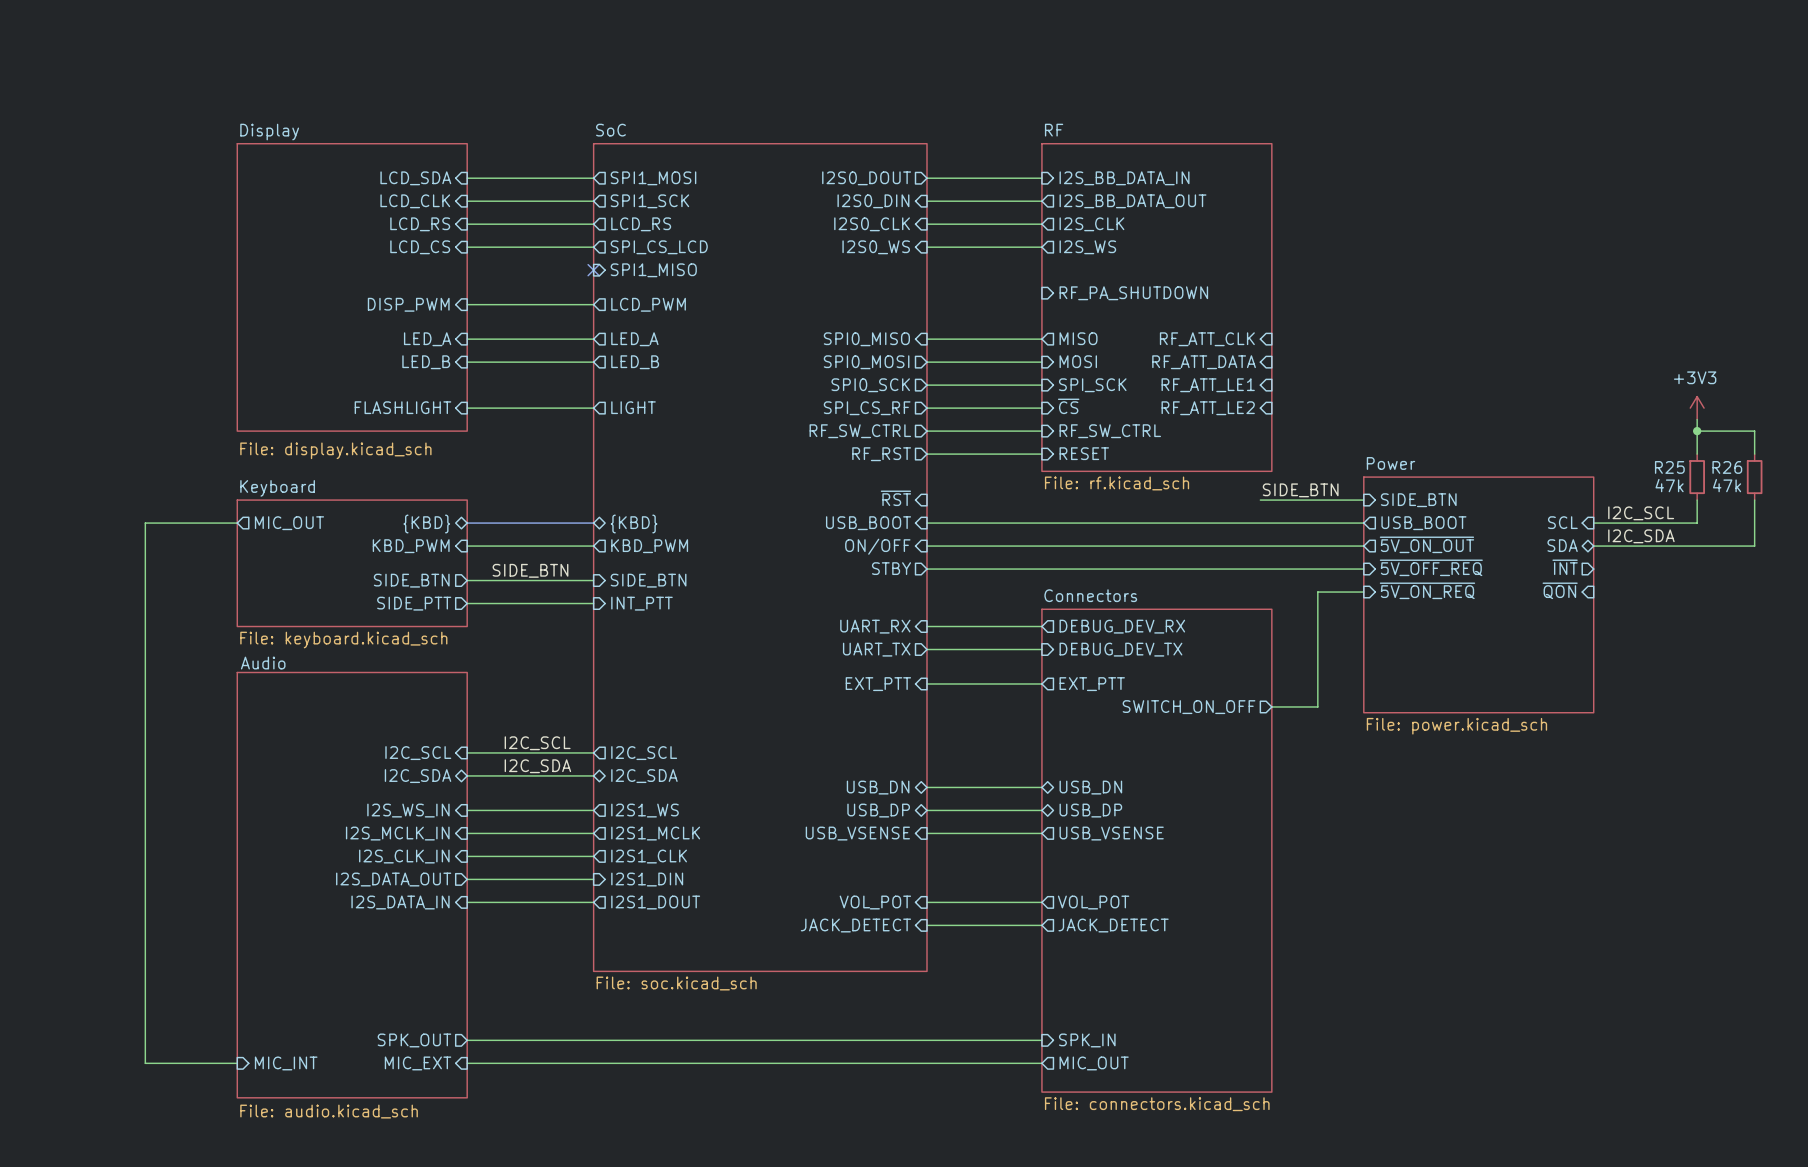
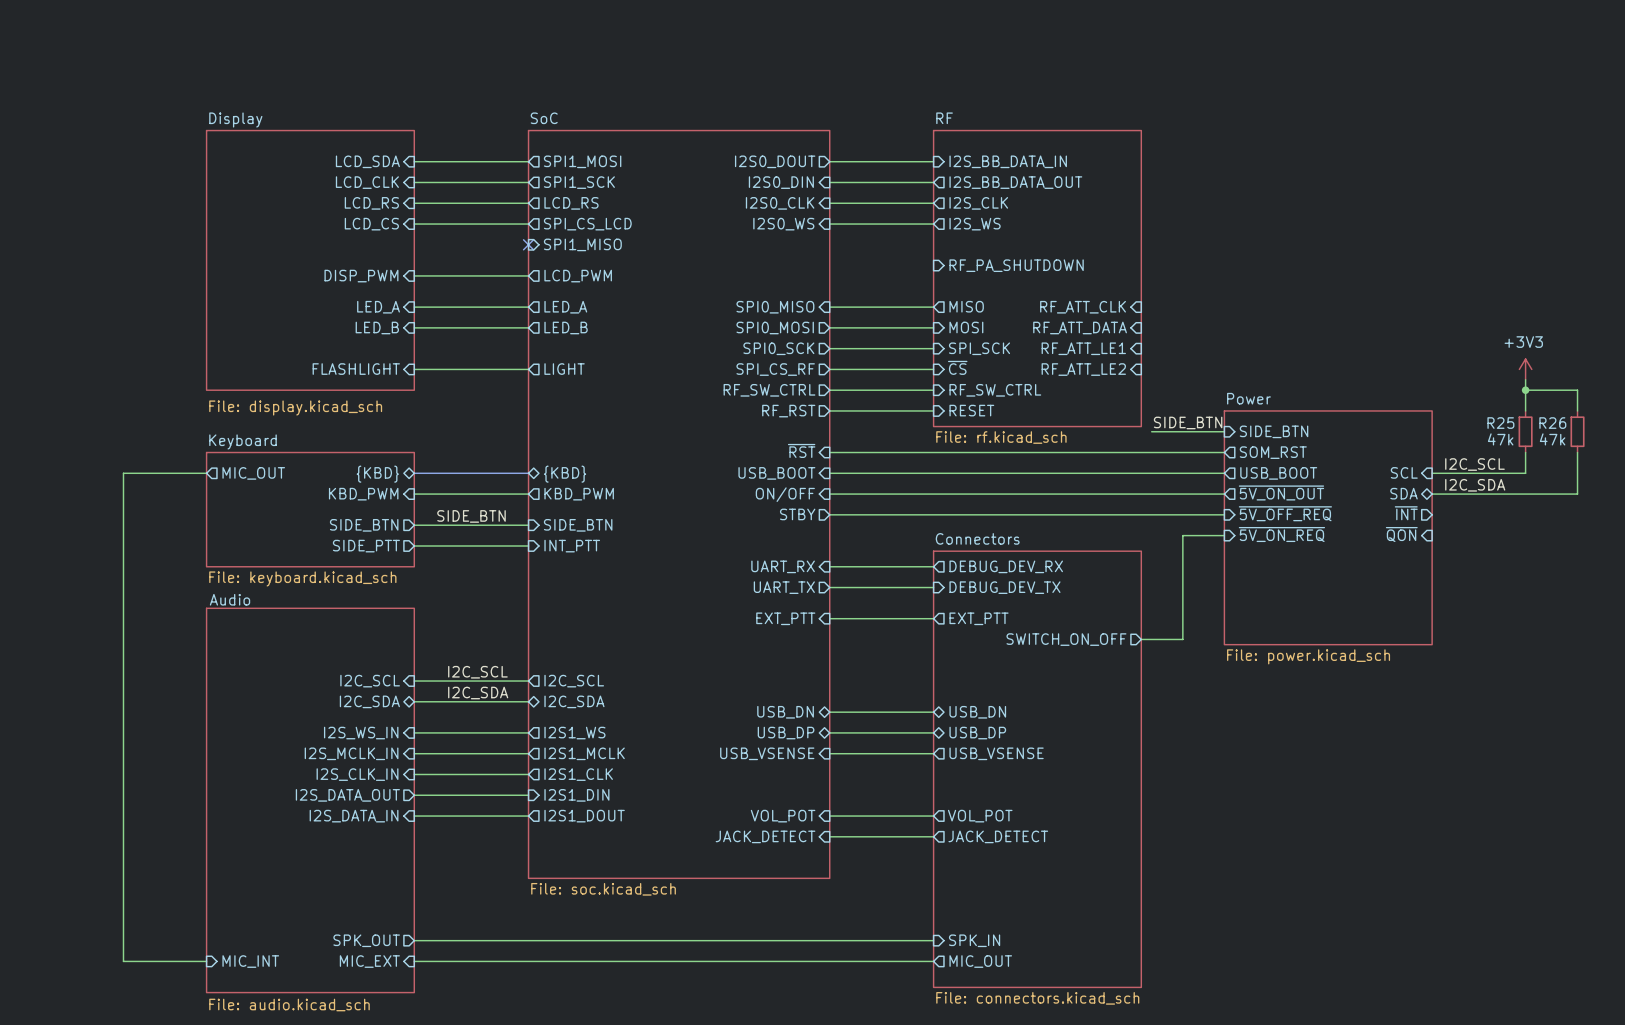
wire: none -> (1151, 431) (1224, 431)
sheet pin: none -> SIDE_BTN (1274, 431)
label position: SIDE_BTN (1300, 490) -> SIDE_BTN (1188, 422)
wire: none -> (829, 452) (1130, 452)
sheet pin shape: input (1418, 500) -> output (1273, 452)
sheet pin: SIDE_BTN (1418, 500) -> SOM_RST (1273, 452)
sheet Power: none -> File: power.kicad_sch (1328, 527)
sheet Power: File: power.kicad_sch (1478, 594) -> none

